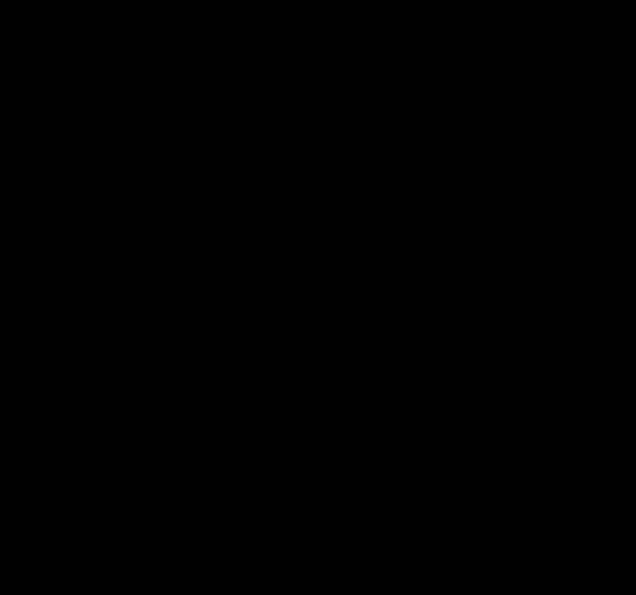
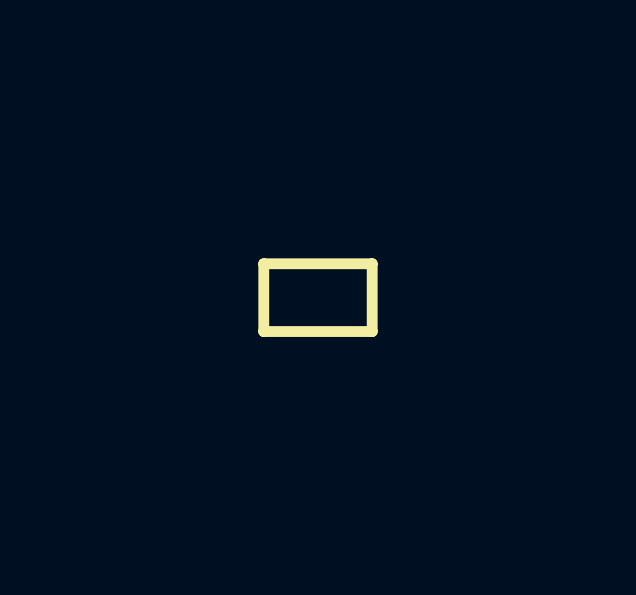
line: none -> (263, 263) (263, 331) (372, 331) (372, 263) (263, 263)

